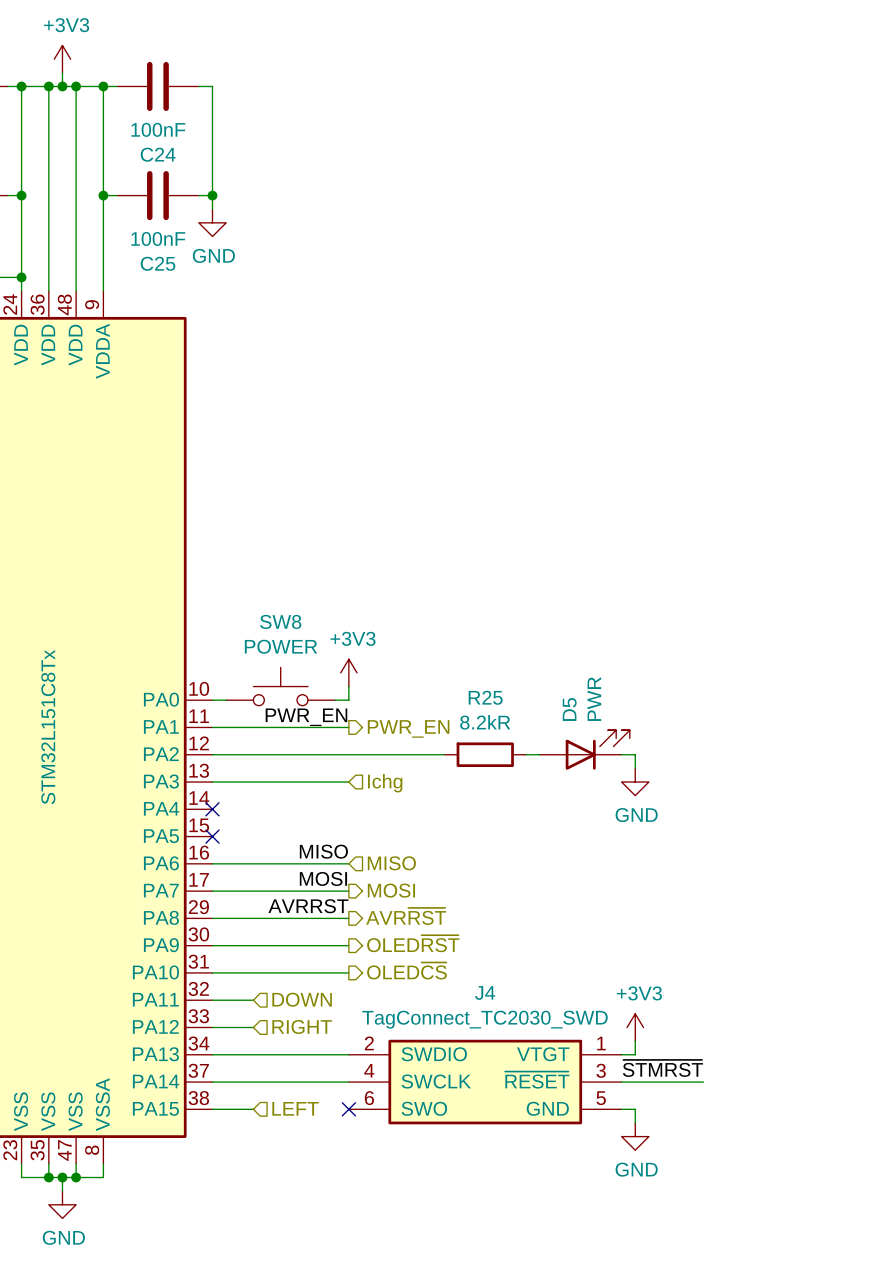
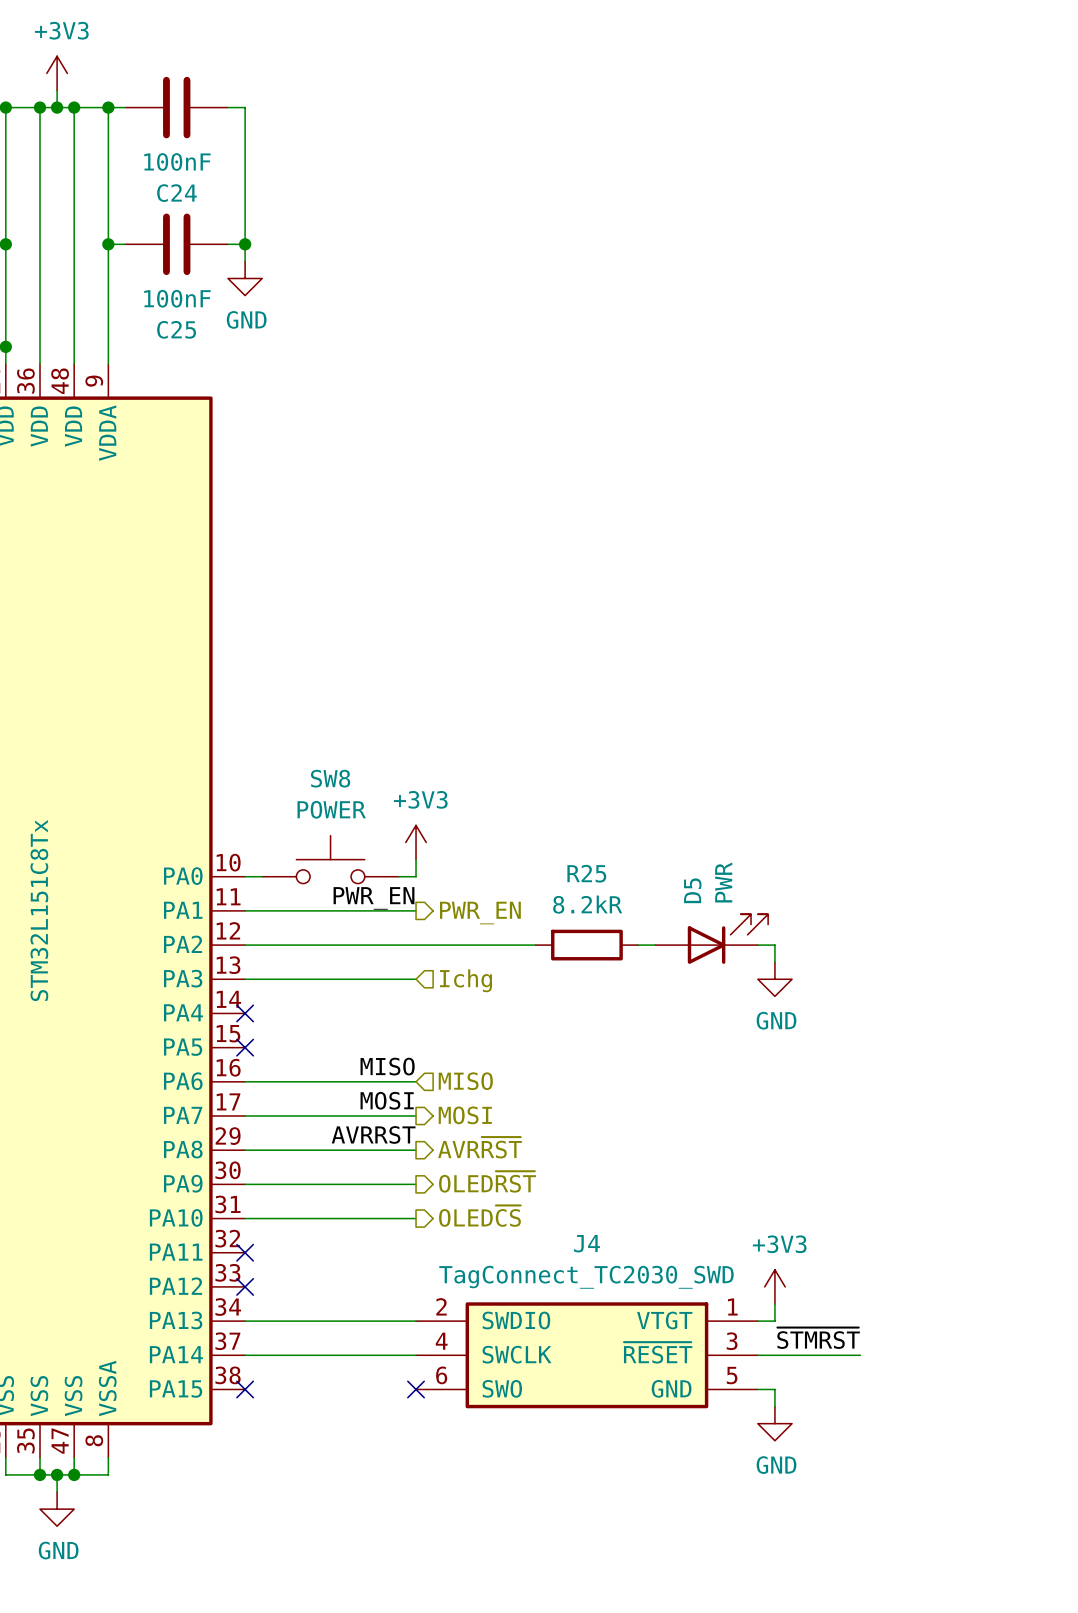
hierarchical label: DOWN (302, 999) -> none
wire: (212, 1000) (253, 1000) -> none
no-connect mark: none -> (245, 1252)
hierarchical label: RIGHT (302, 1026) -> none
wire: (212, 1027) (253, 1027) -> none
no-connect mark: none -> (245, 1286)
hierarchical label: LEFT (295, 1108) -> none
wire: (212, 1109) (253, 1109) -> none
no-connect mark: none -> (245, 1389)

